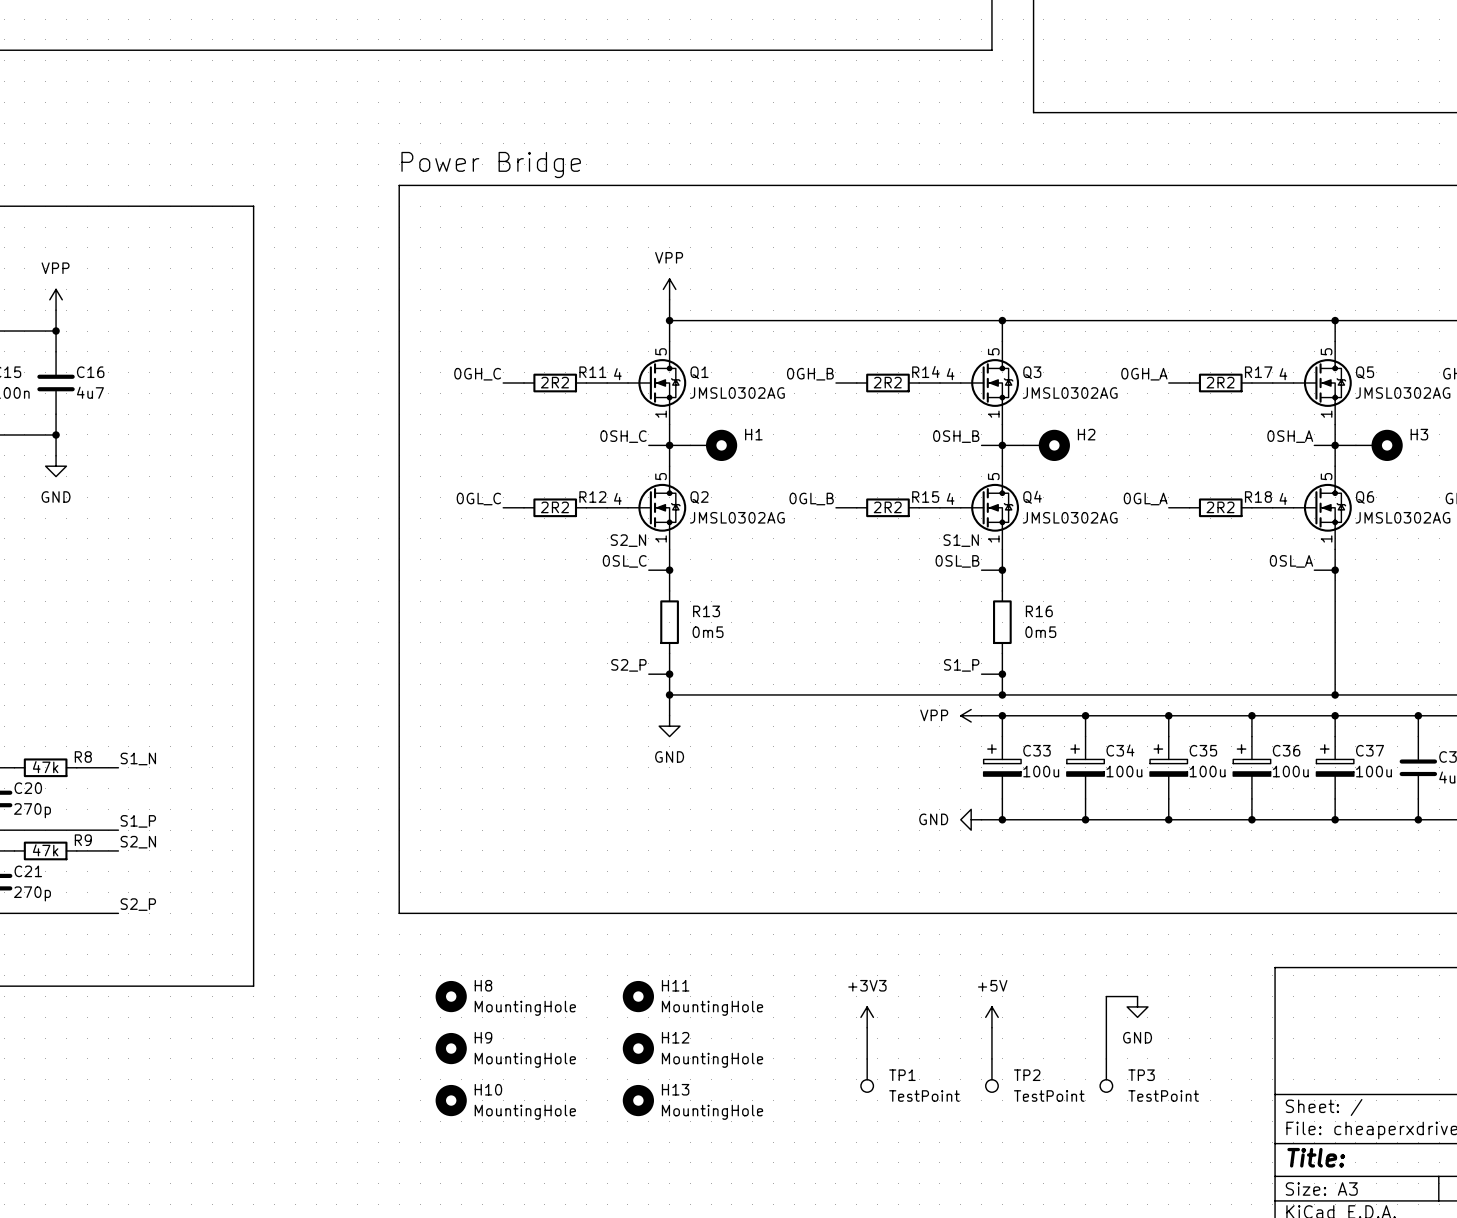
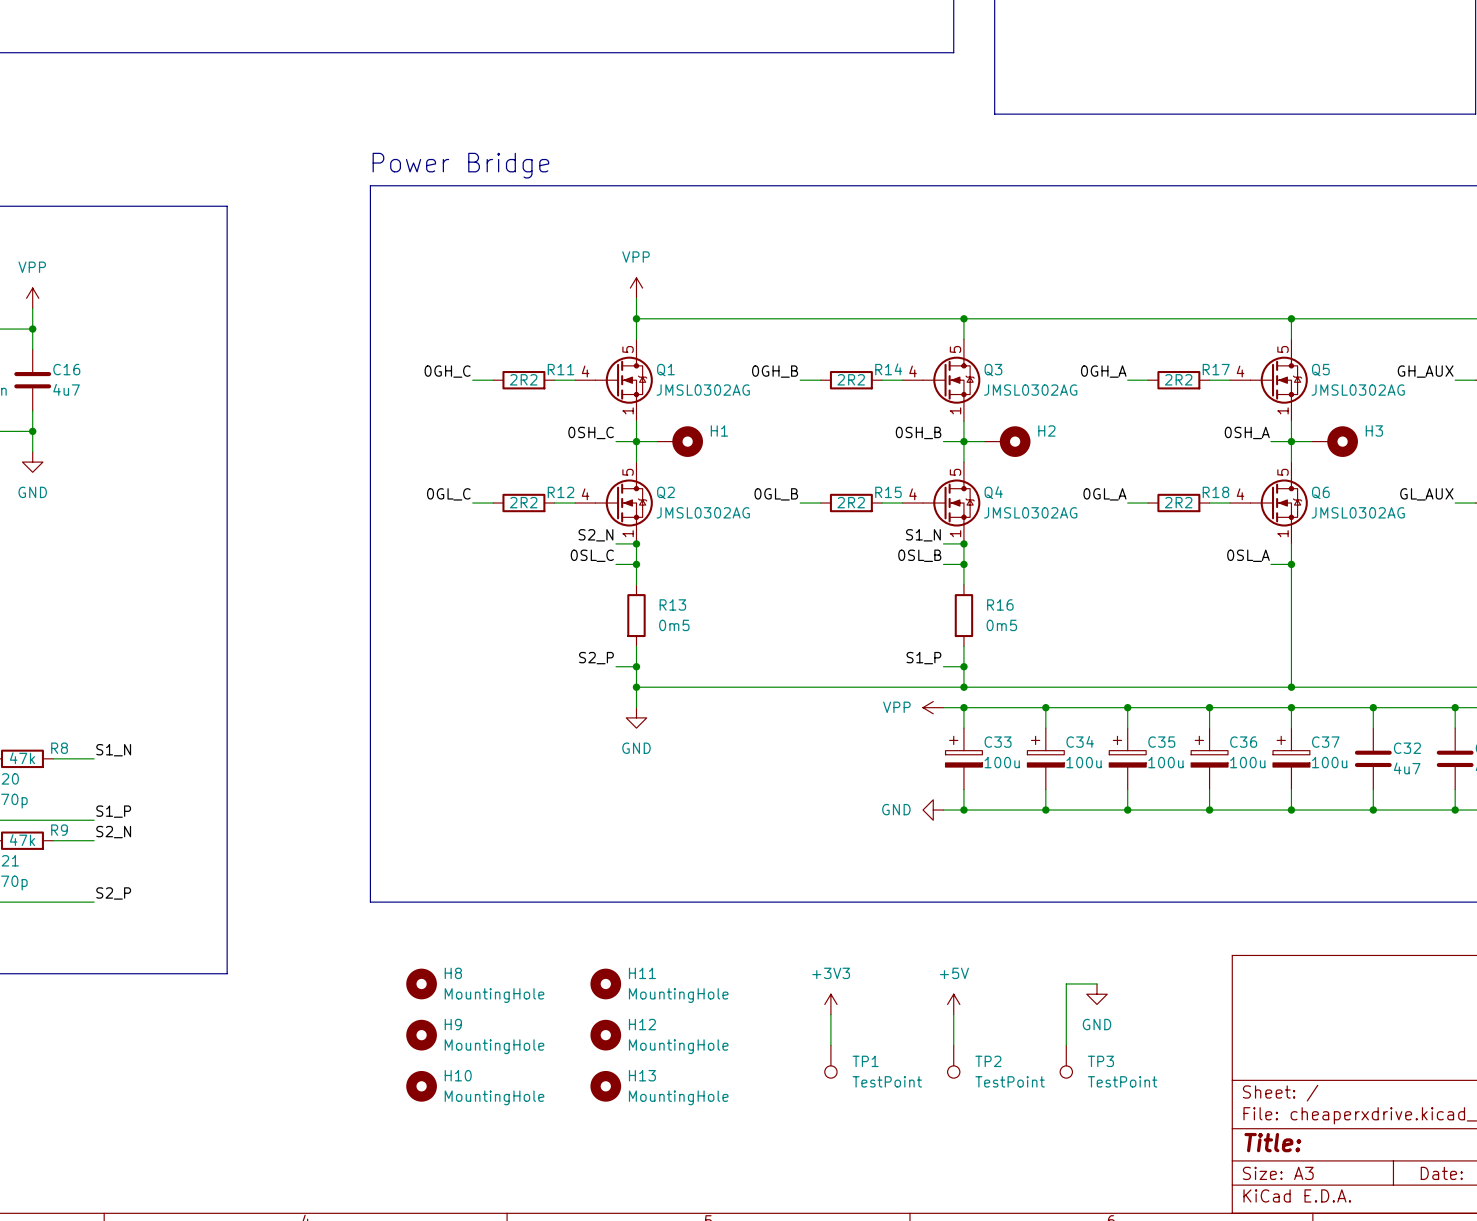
wire: none -> (616, 543) (636, 543)
junction: none -> (636, 543)
wire: none -> (943, 543) (963, 543)
junction: none -> (963, 543)

